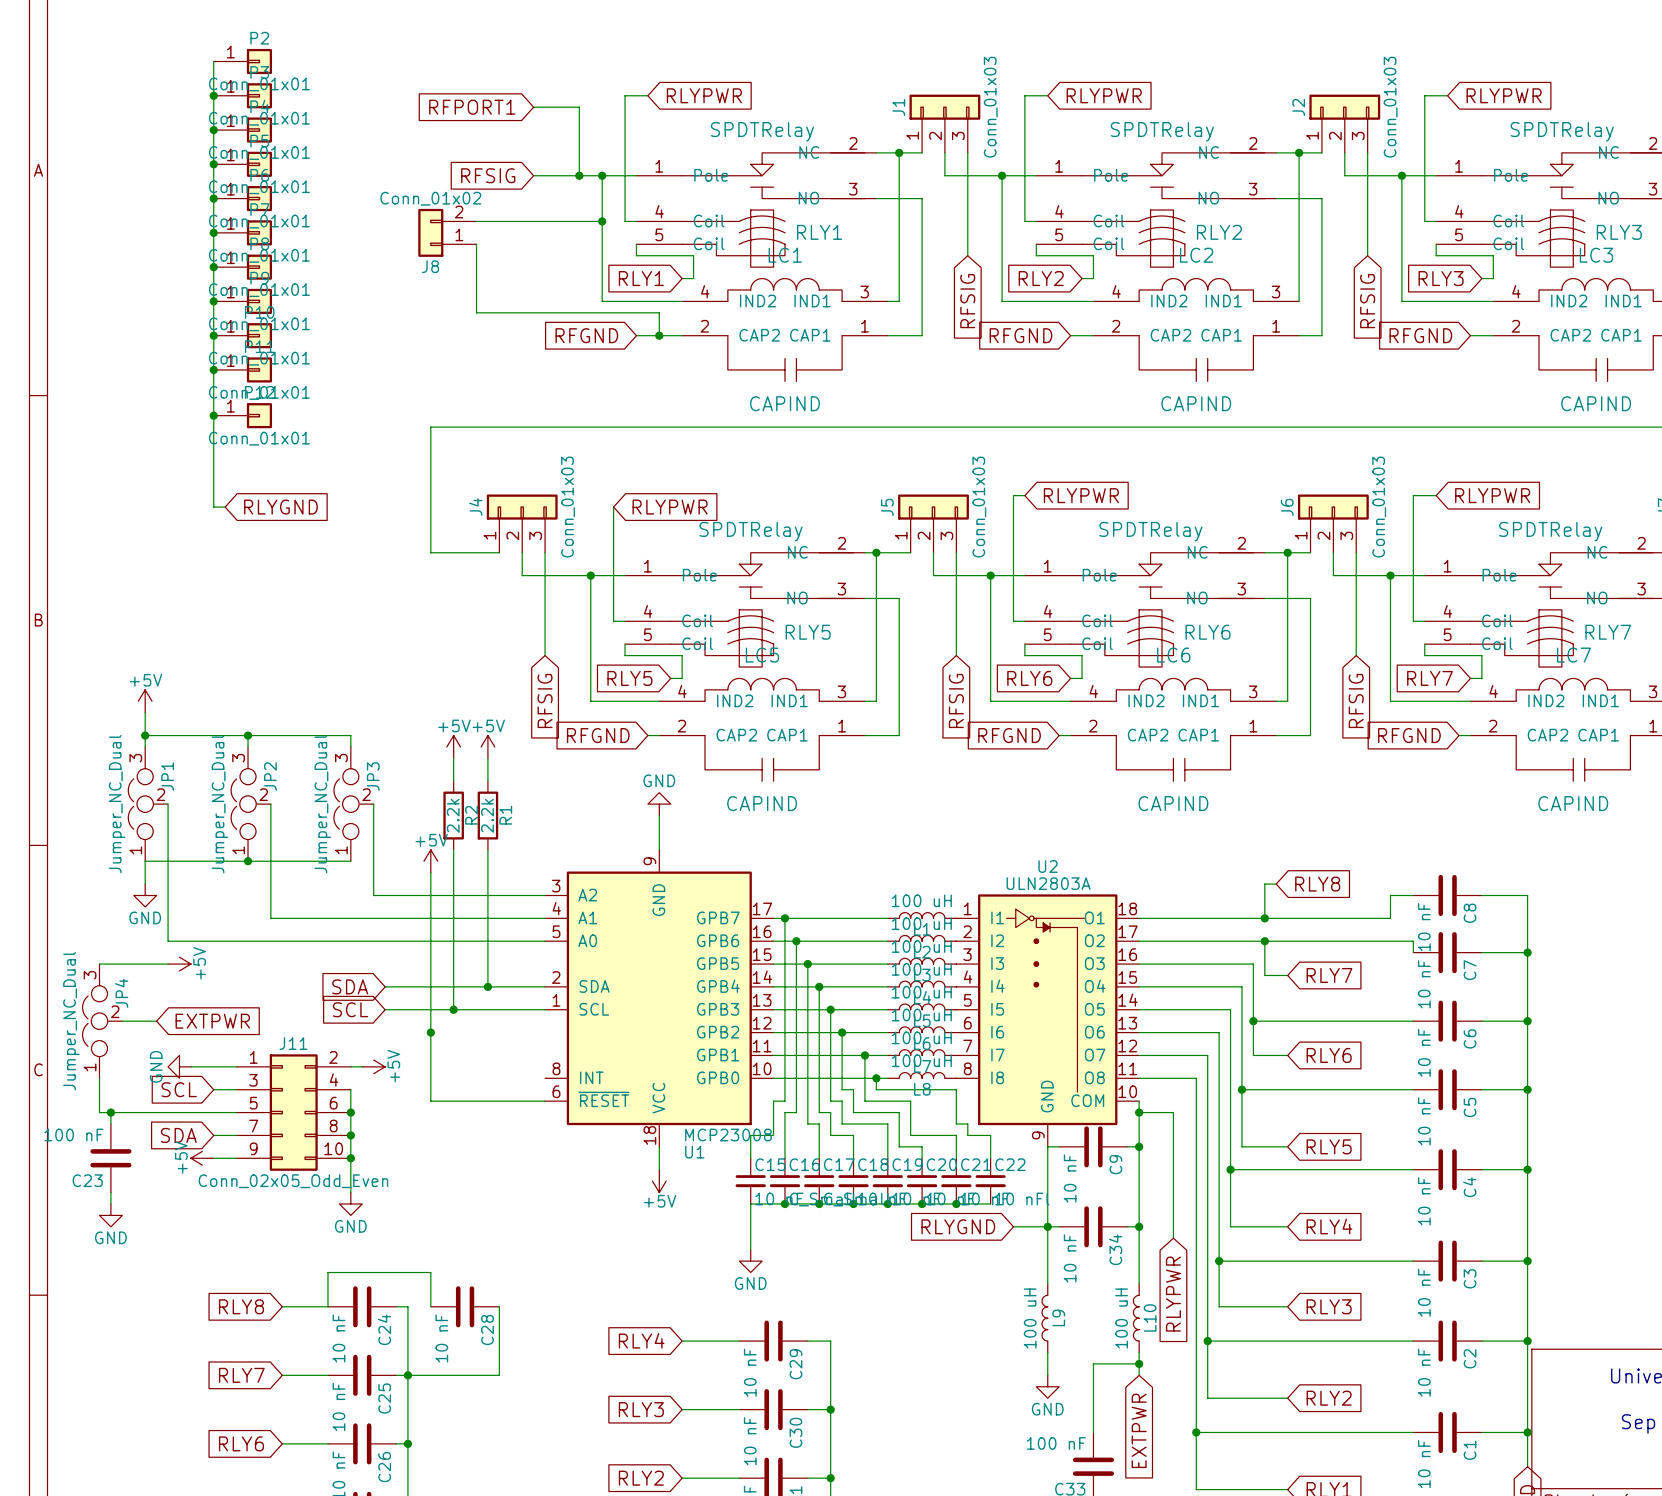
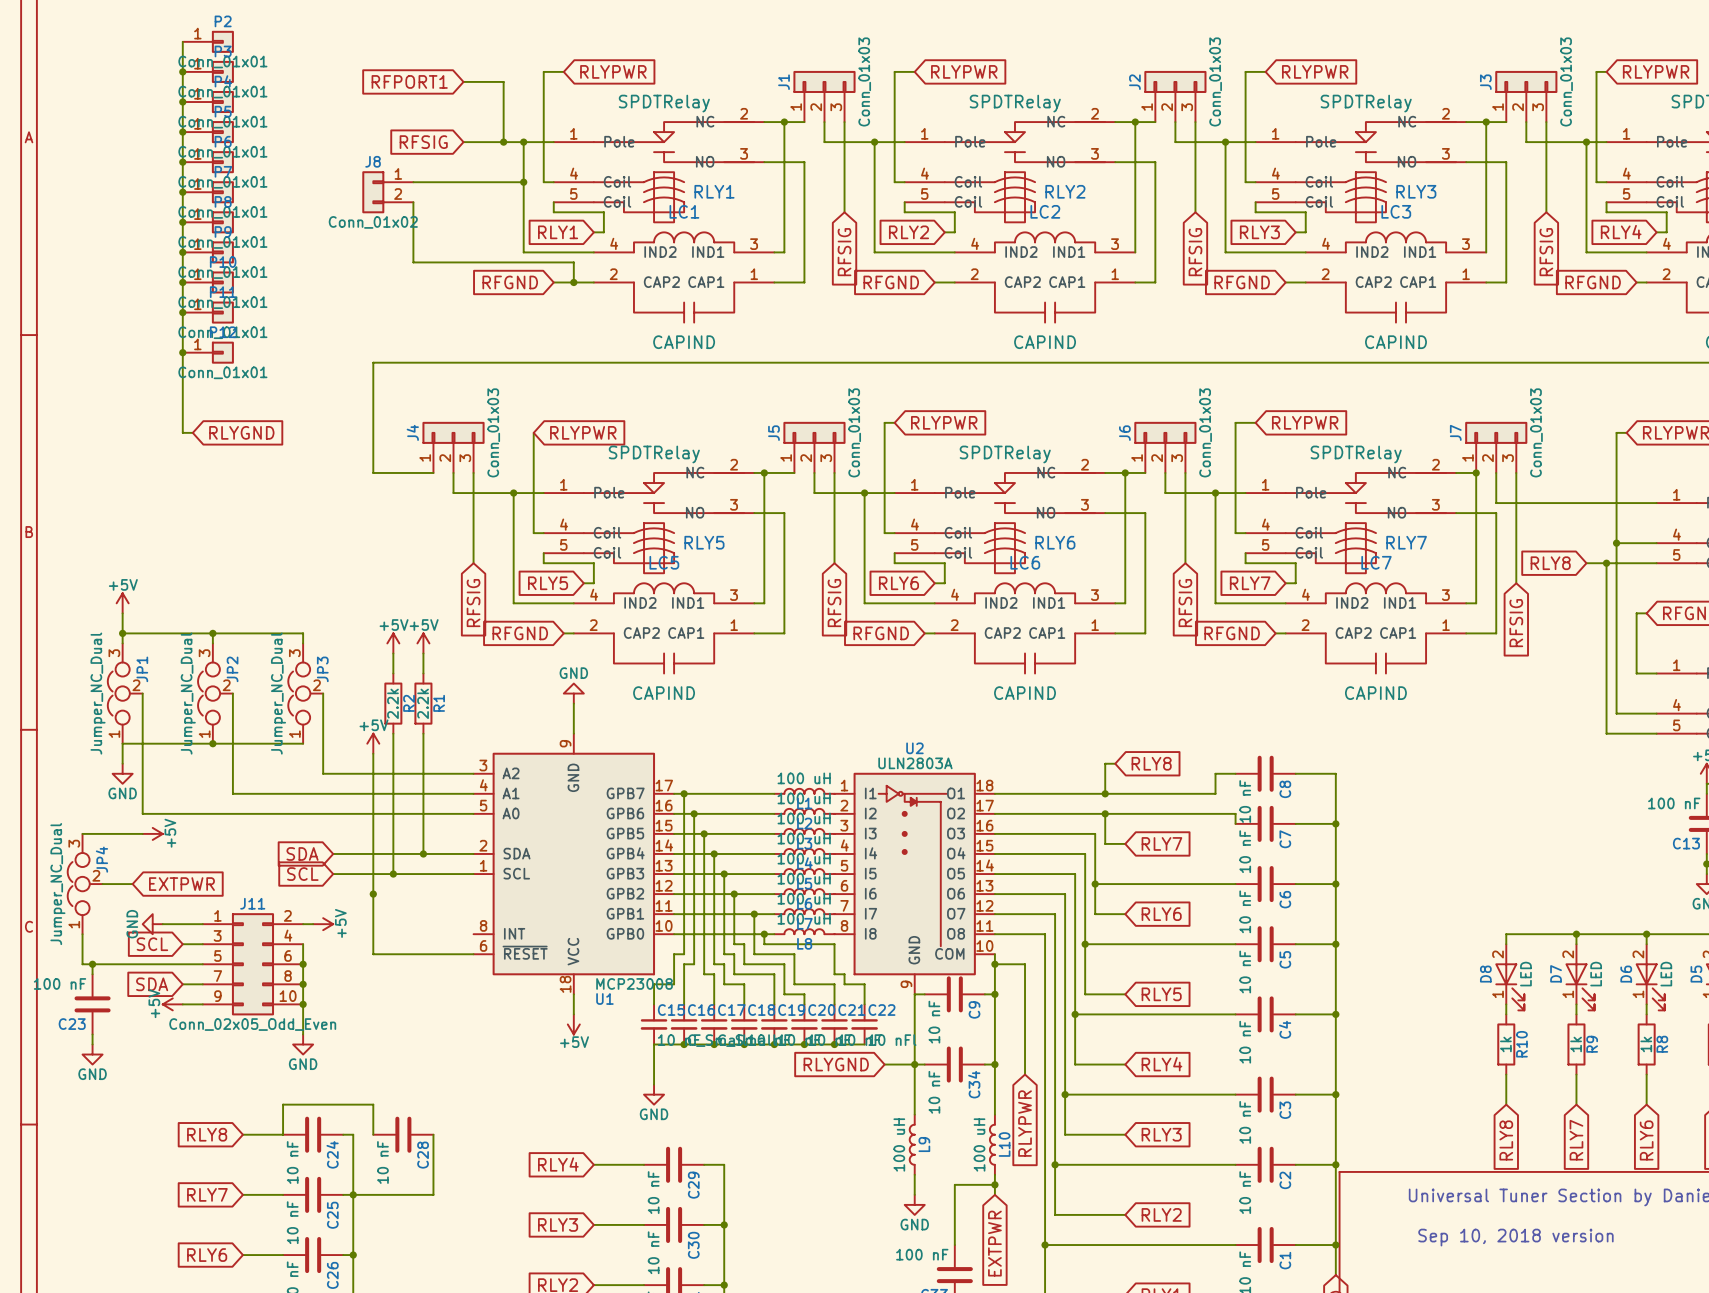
J8 flip: as is (430, 232) -> up-down (373, 192)

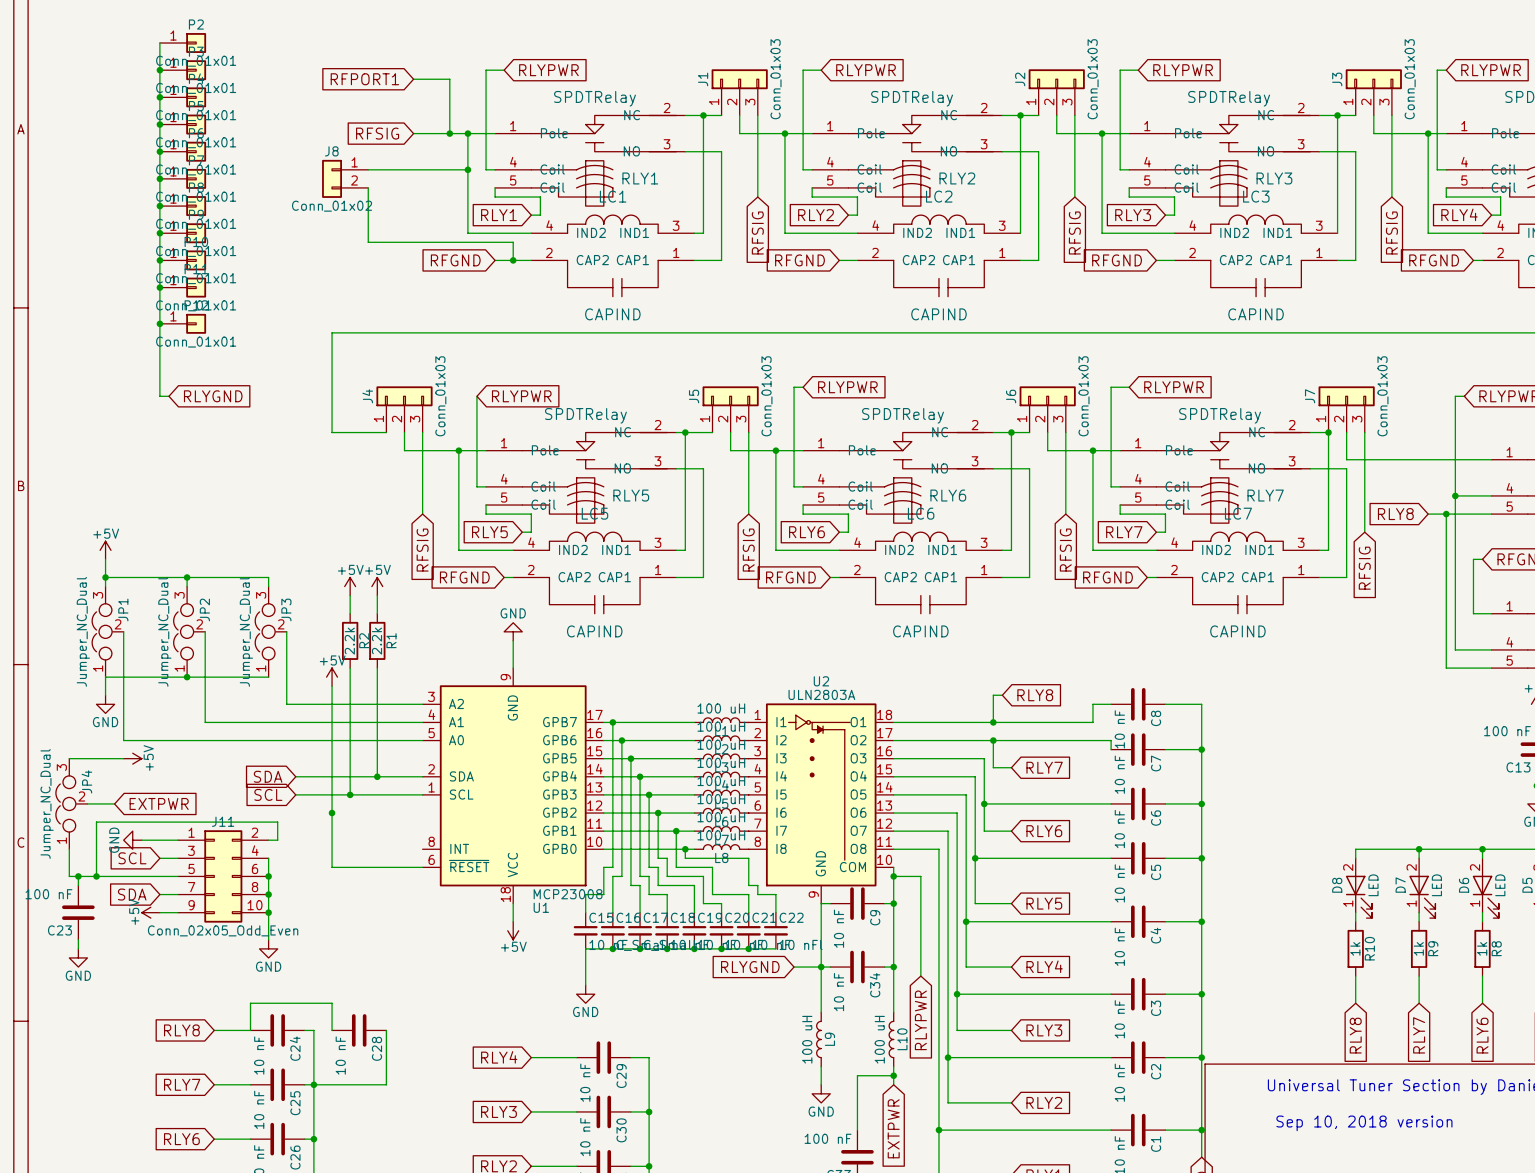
wire: none -> (277, 840) (277, 822) (96, 822) (96, 876)
power symbol: +5V (323, 924) -> none
junction: none -> (96, 876)

